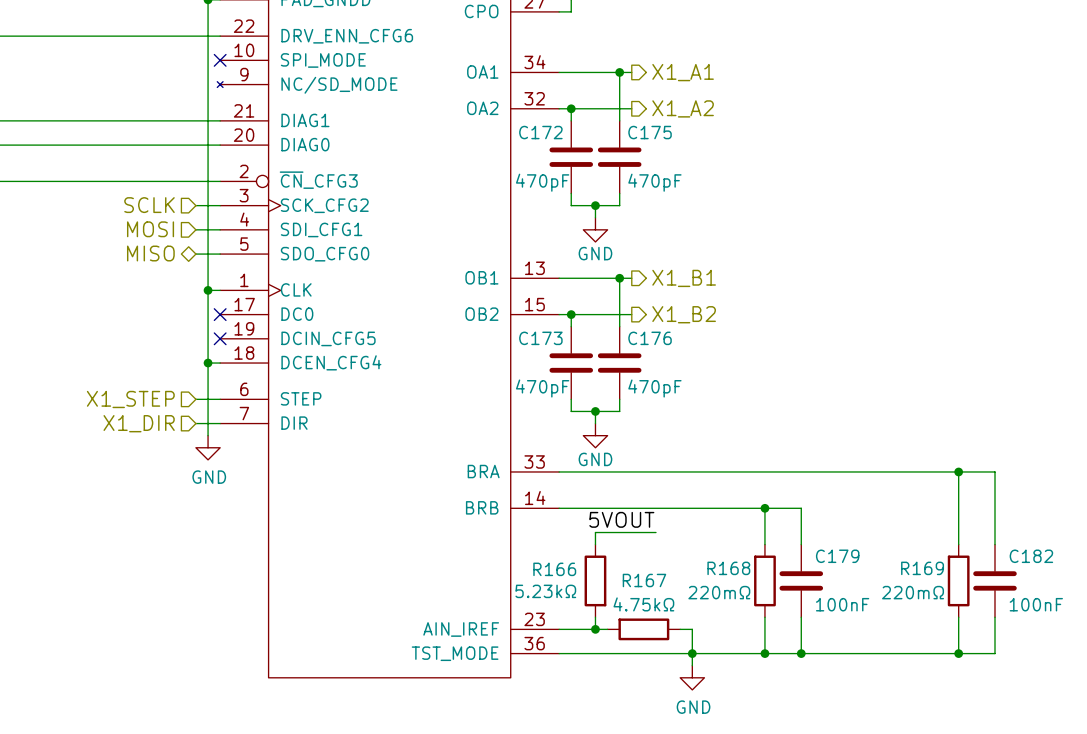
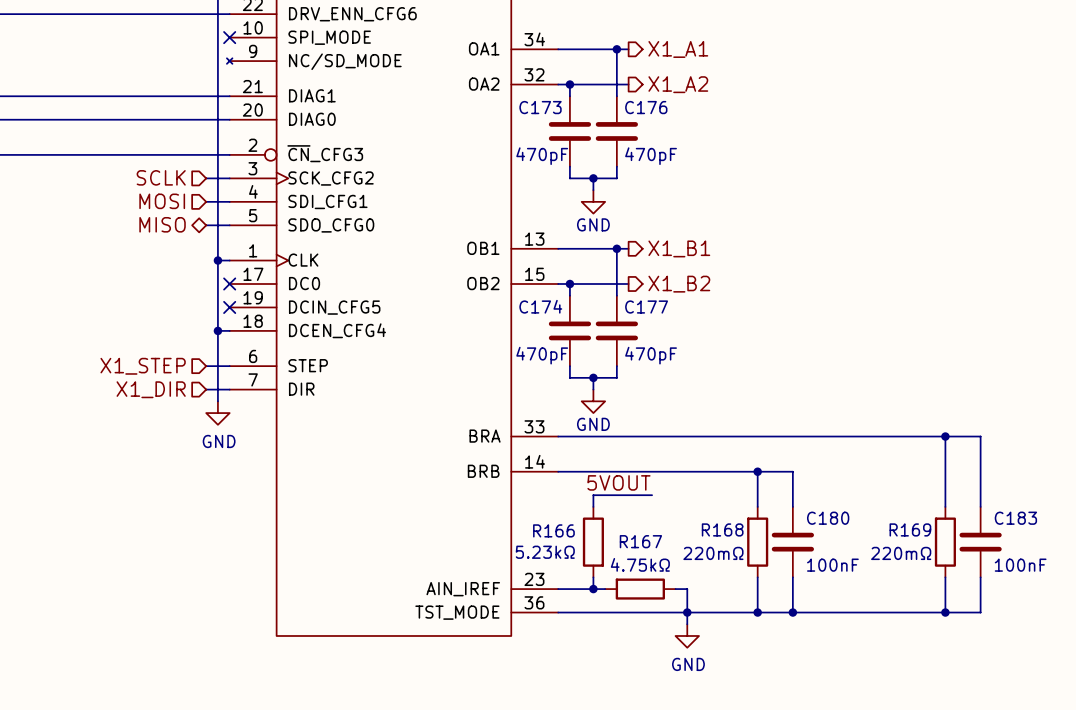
C172 name: C172 (540, 132) -> C173 (540, 107)
C175 name: C175 (650, 132) -> C176 (646, 107)
C173 name: C173 (540, 338) -> C174 (540, 306)
C176 name: C176 (650, 338) -> C177 (646, 307)
C179 name: C179 (837, 556) -> C180 (828, 518)
C182 name: C182 (1031, 556) -> C183 (1015, 518)

